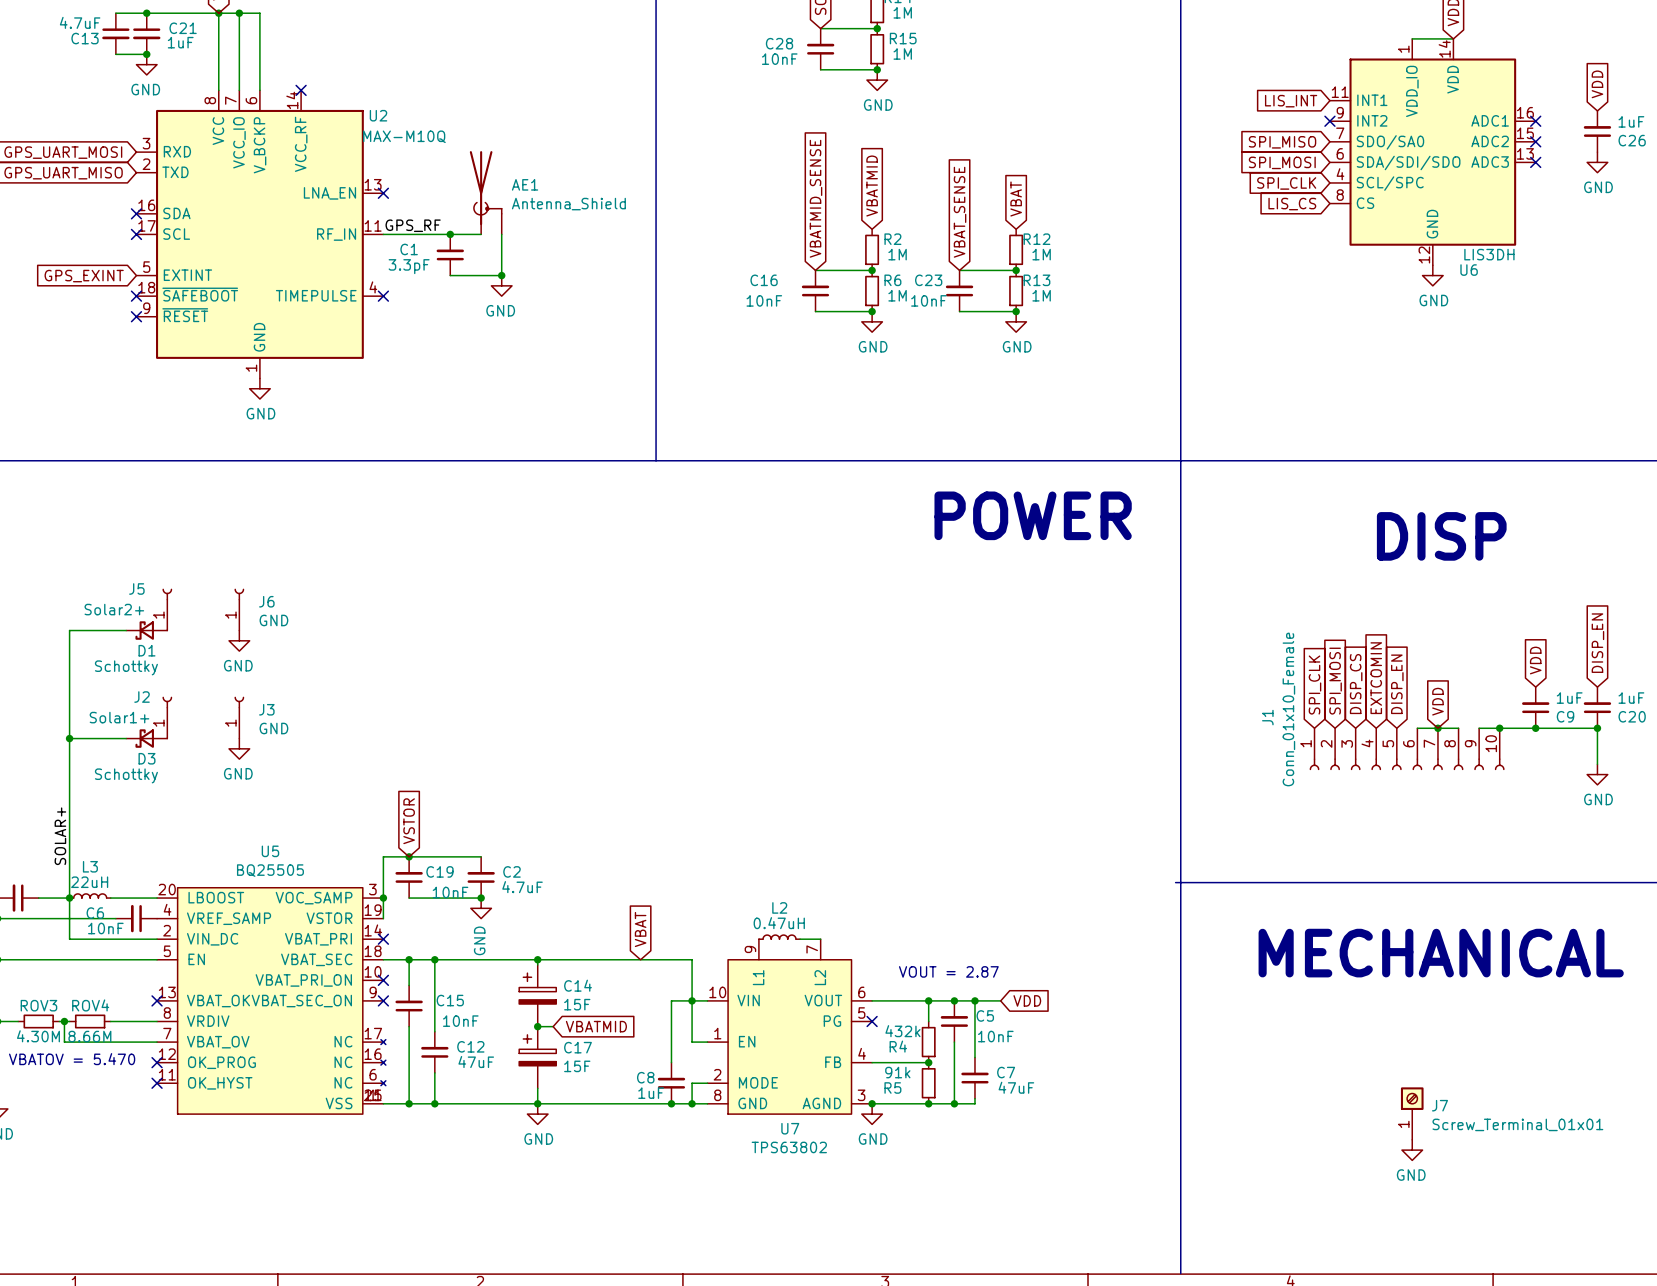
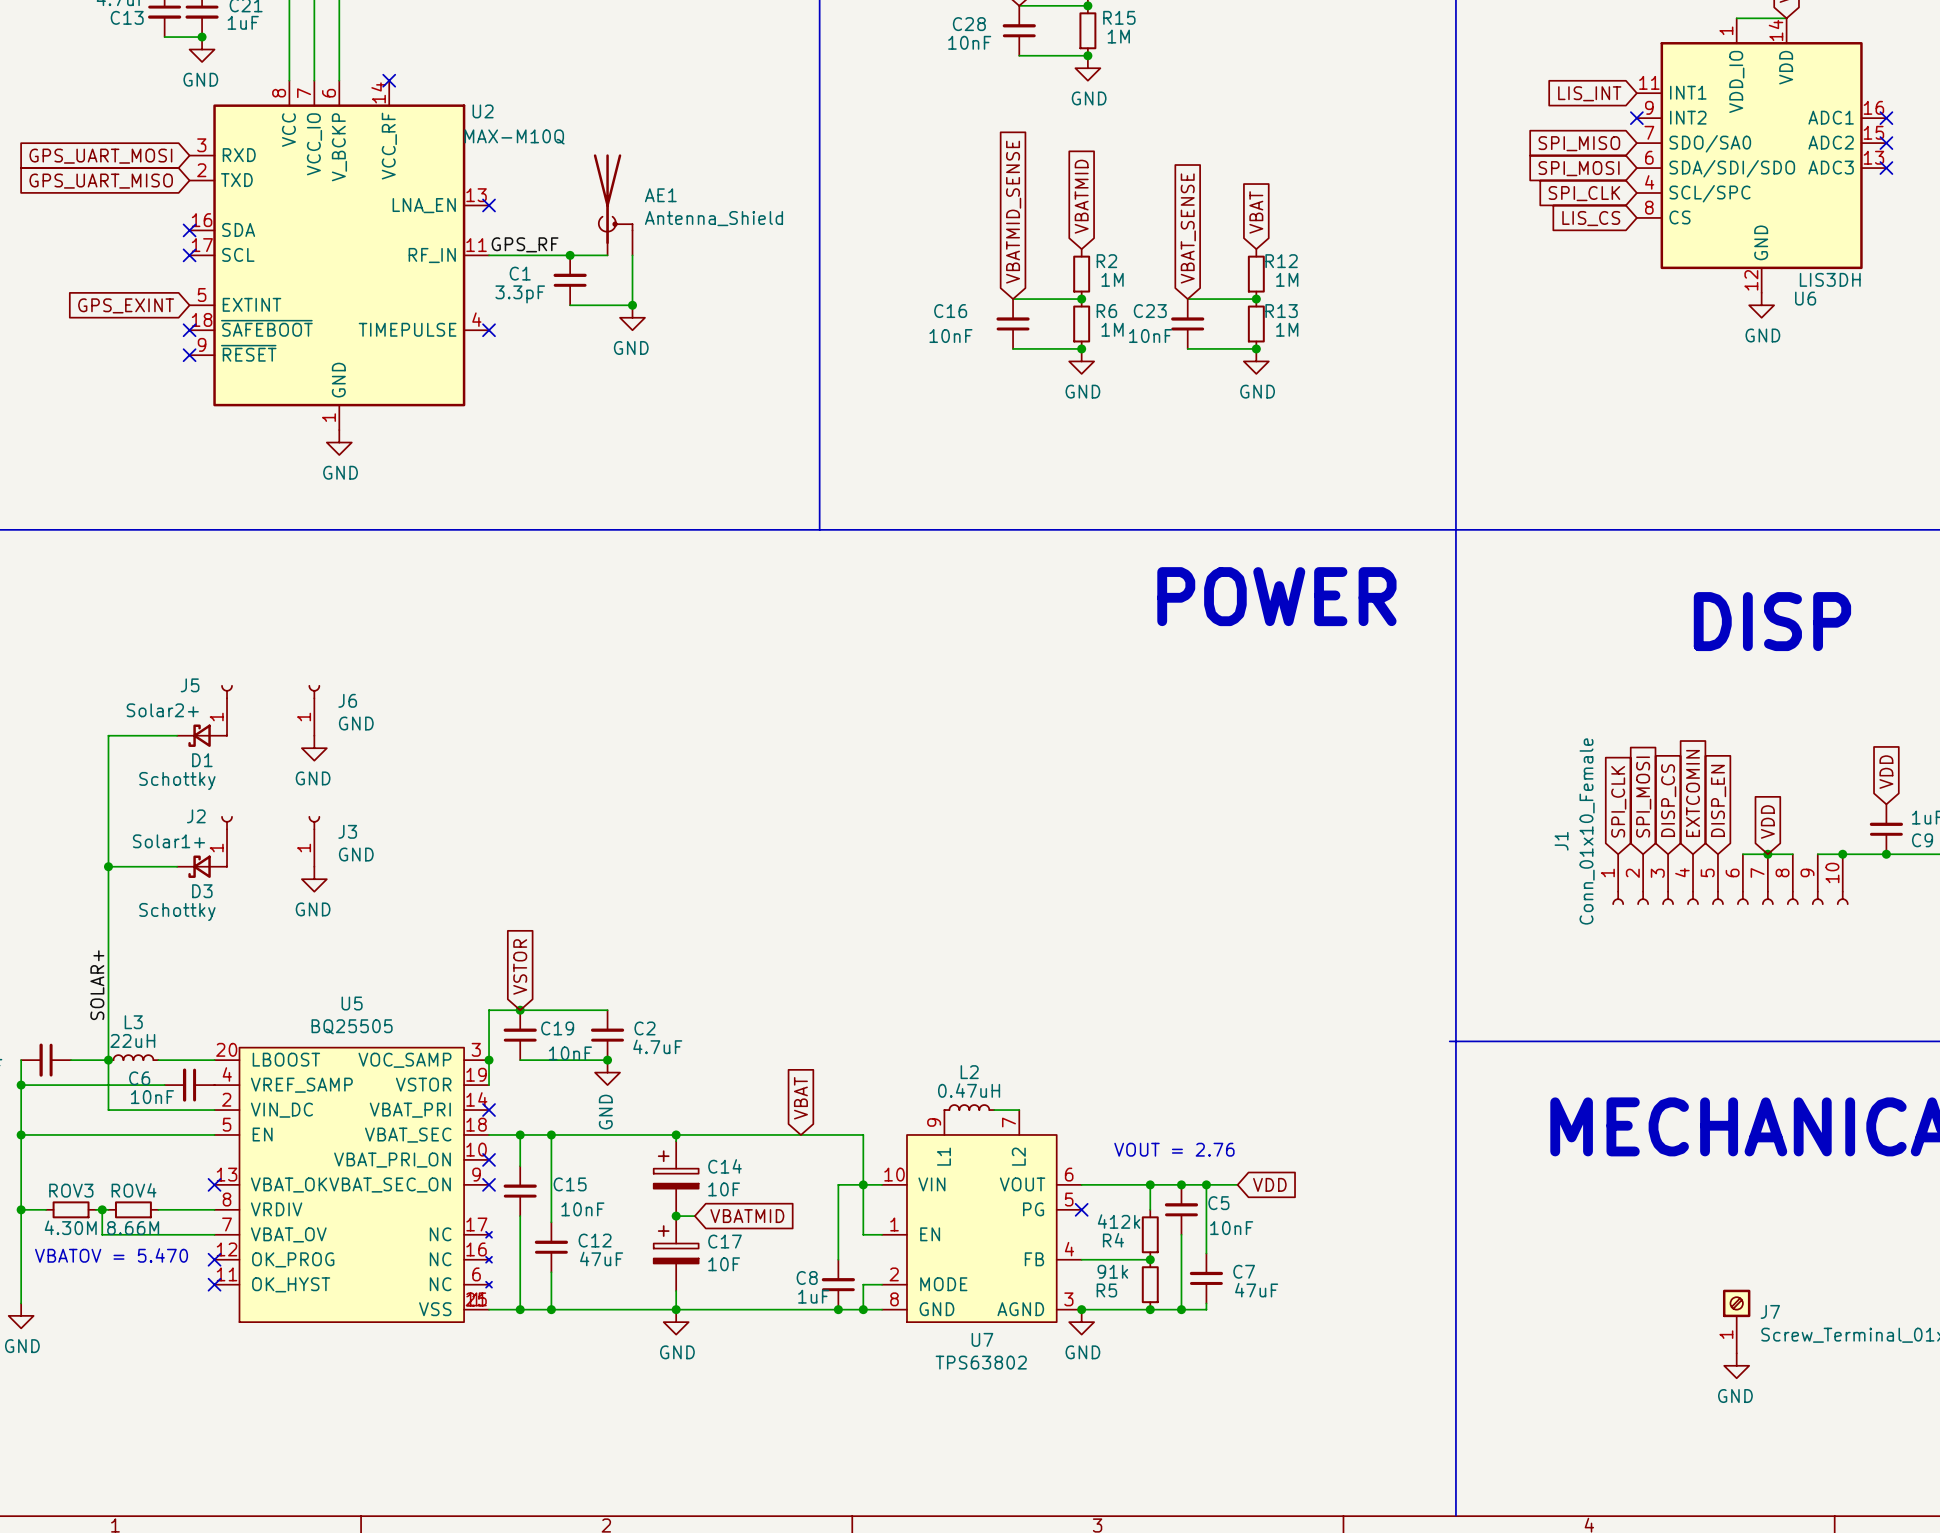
text: VOUT = 2.87 (948, 971) -> VOUT = 2.76 (1174, 1149)
C14 value: 15F (577, 1004) -> 10F (724, 1189)
R4 value: 432k (902, 1031) -> 412k (1119, 1221)
C17 value: 15F (577, 1066) -> 10F (724, 1264)

